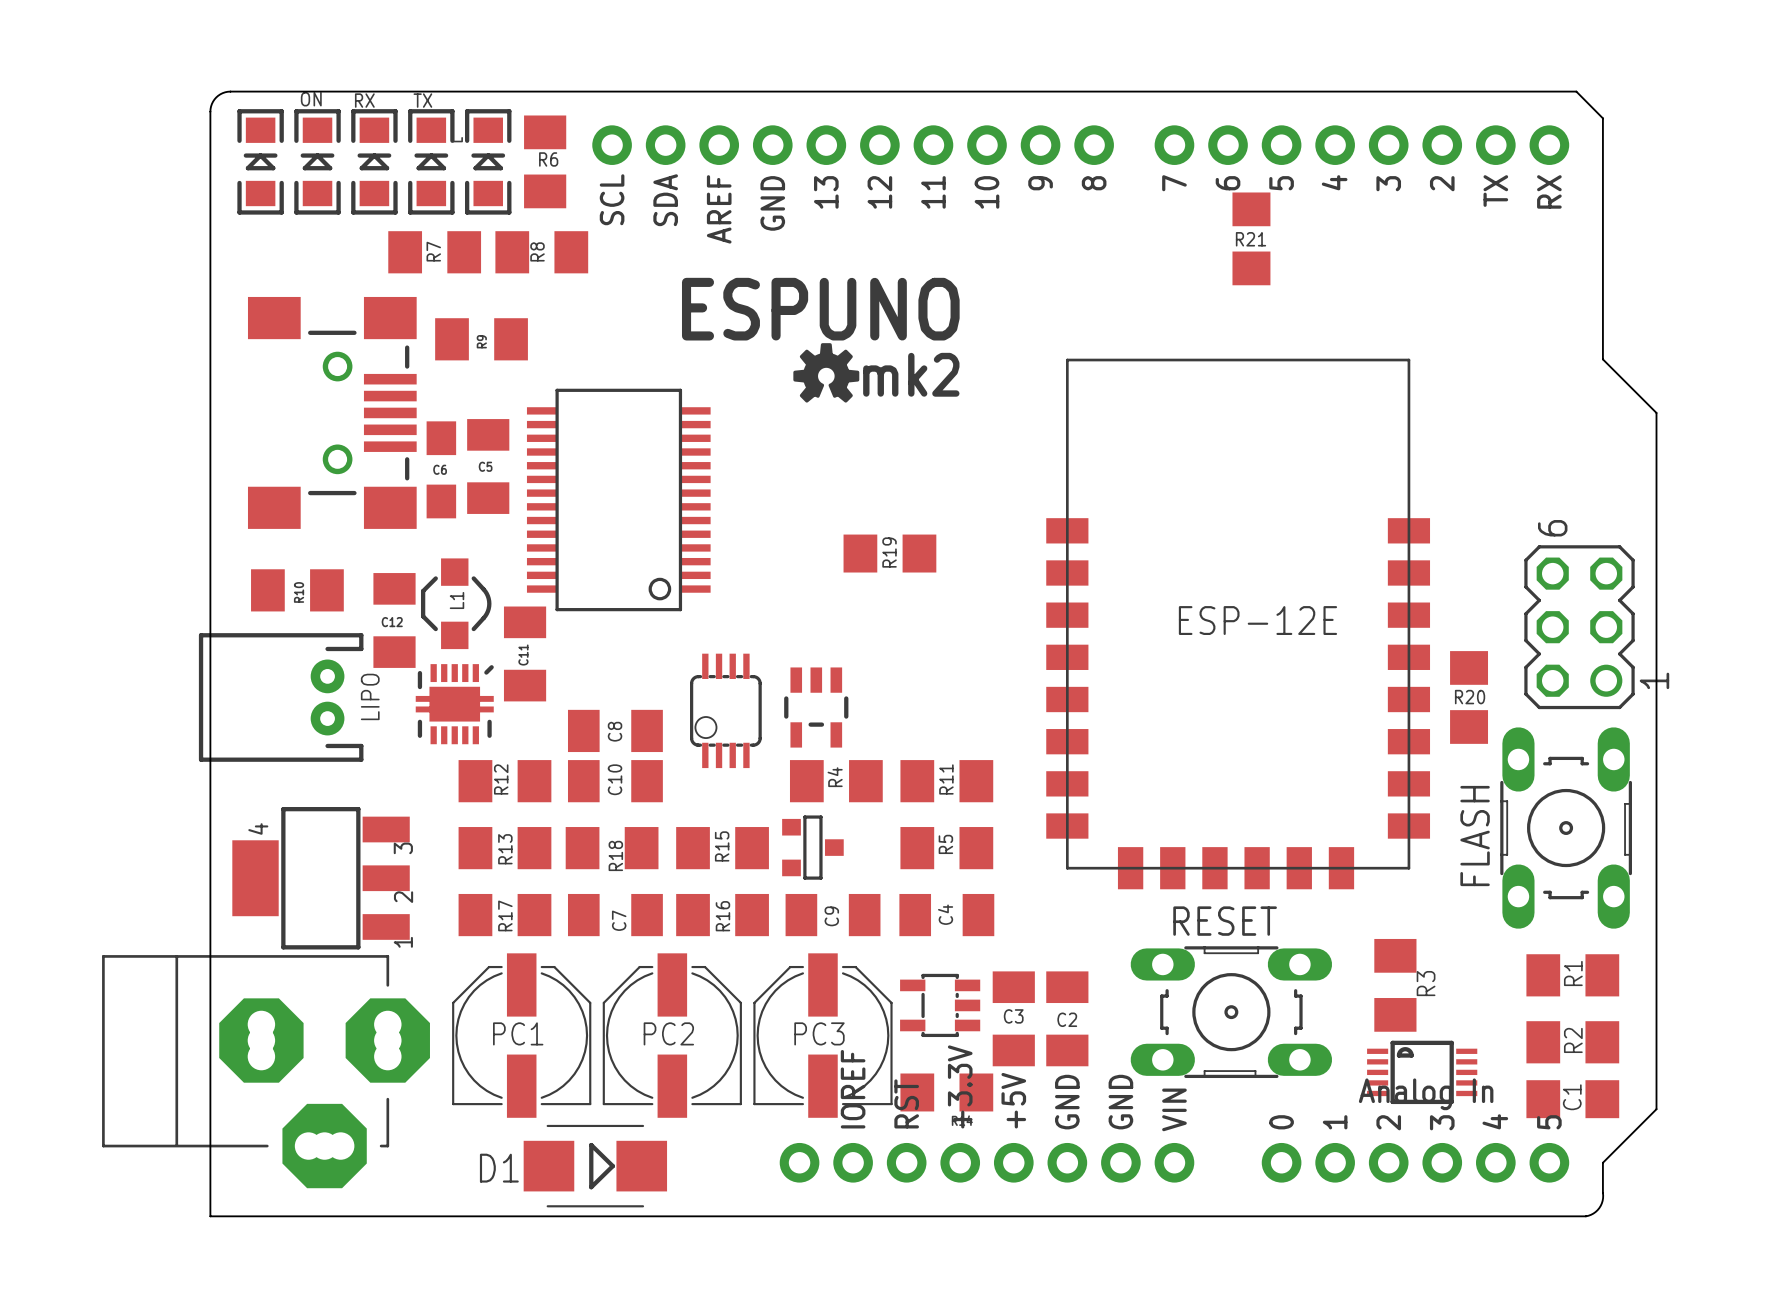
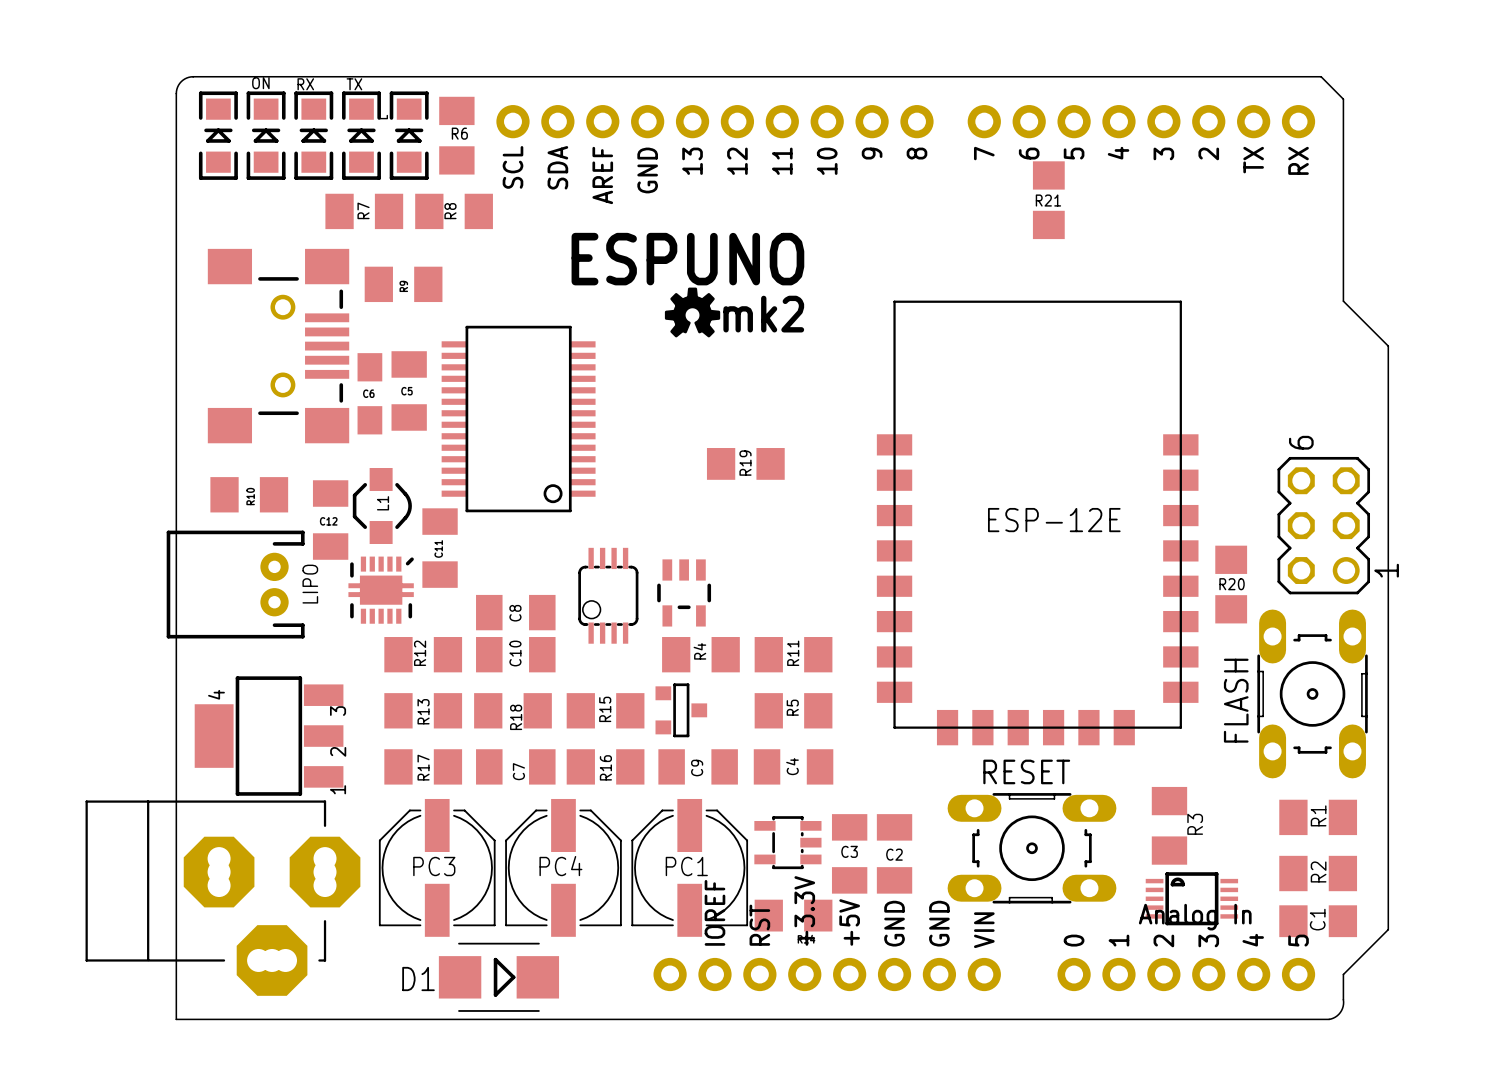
PC1 name: PC1 (518, 1033) -> PC3 (434, 866)
PC2 name: PC2 (668, 1033) -> PC4 (560, 866)
PC3 name: PC3 (819, 1033) -> PC1 (686, 866)

